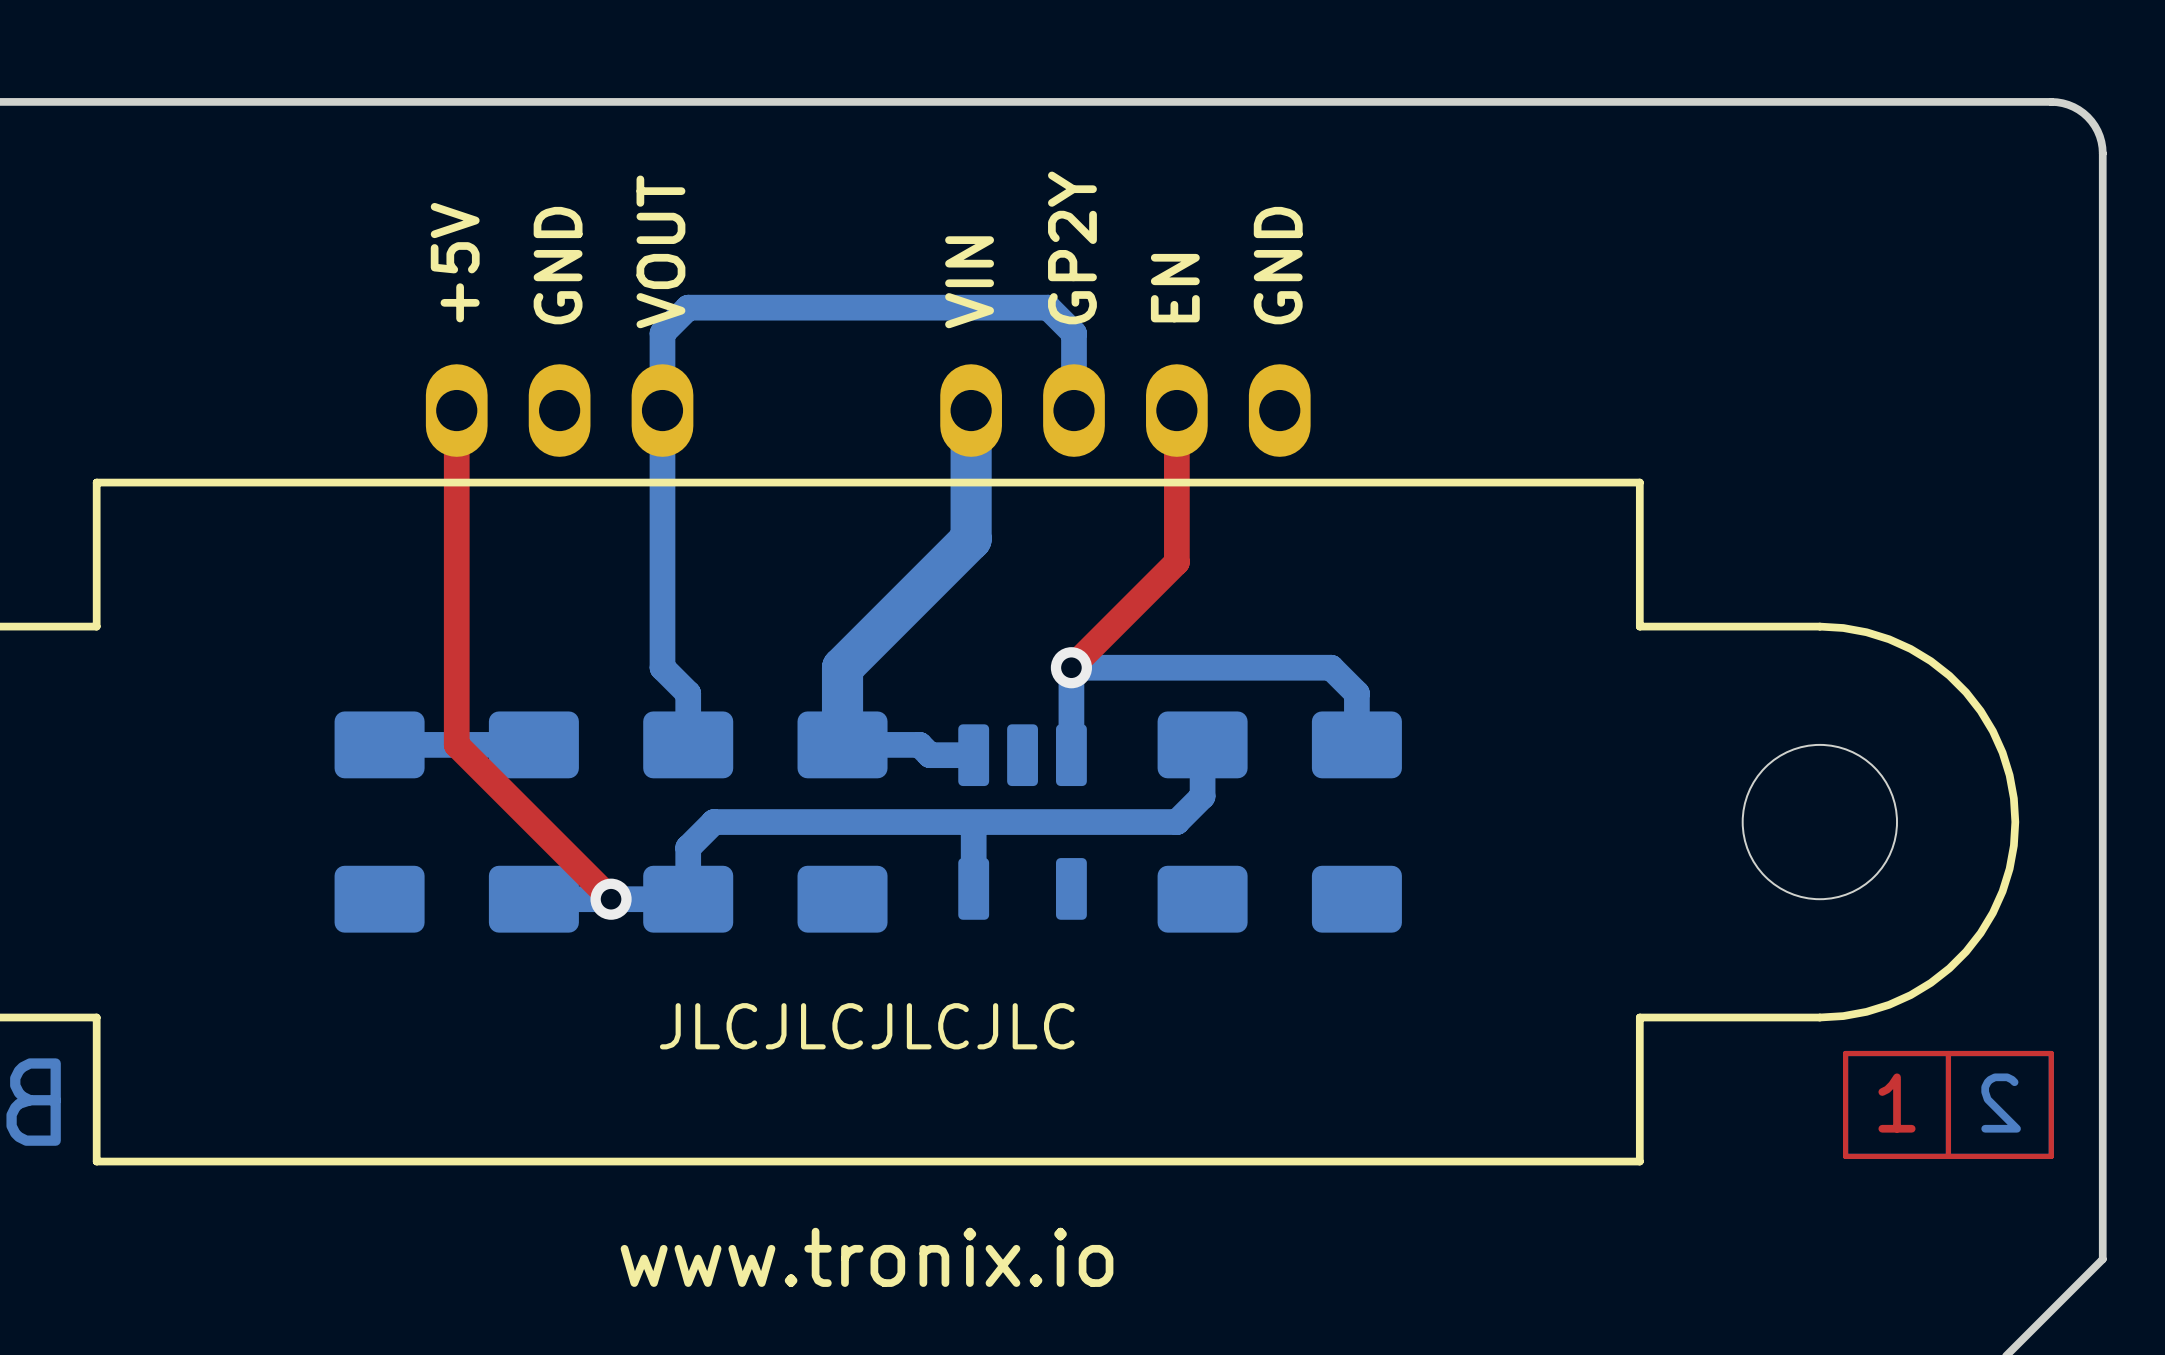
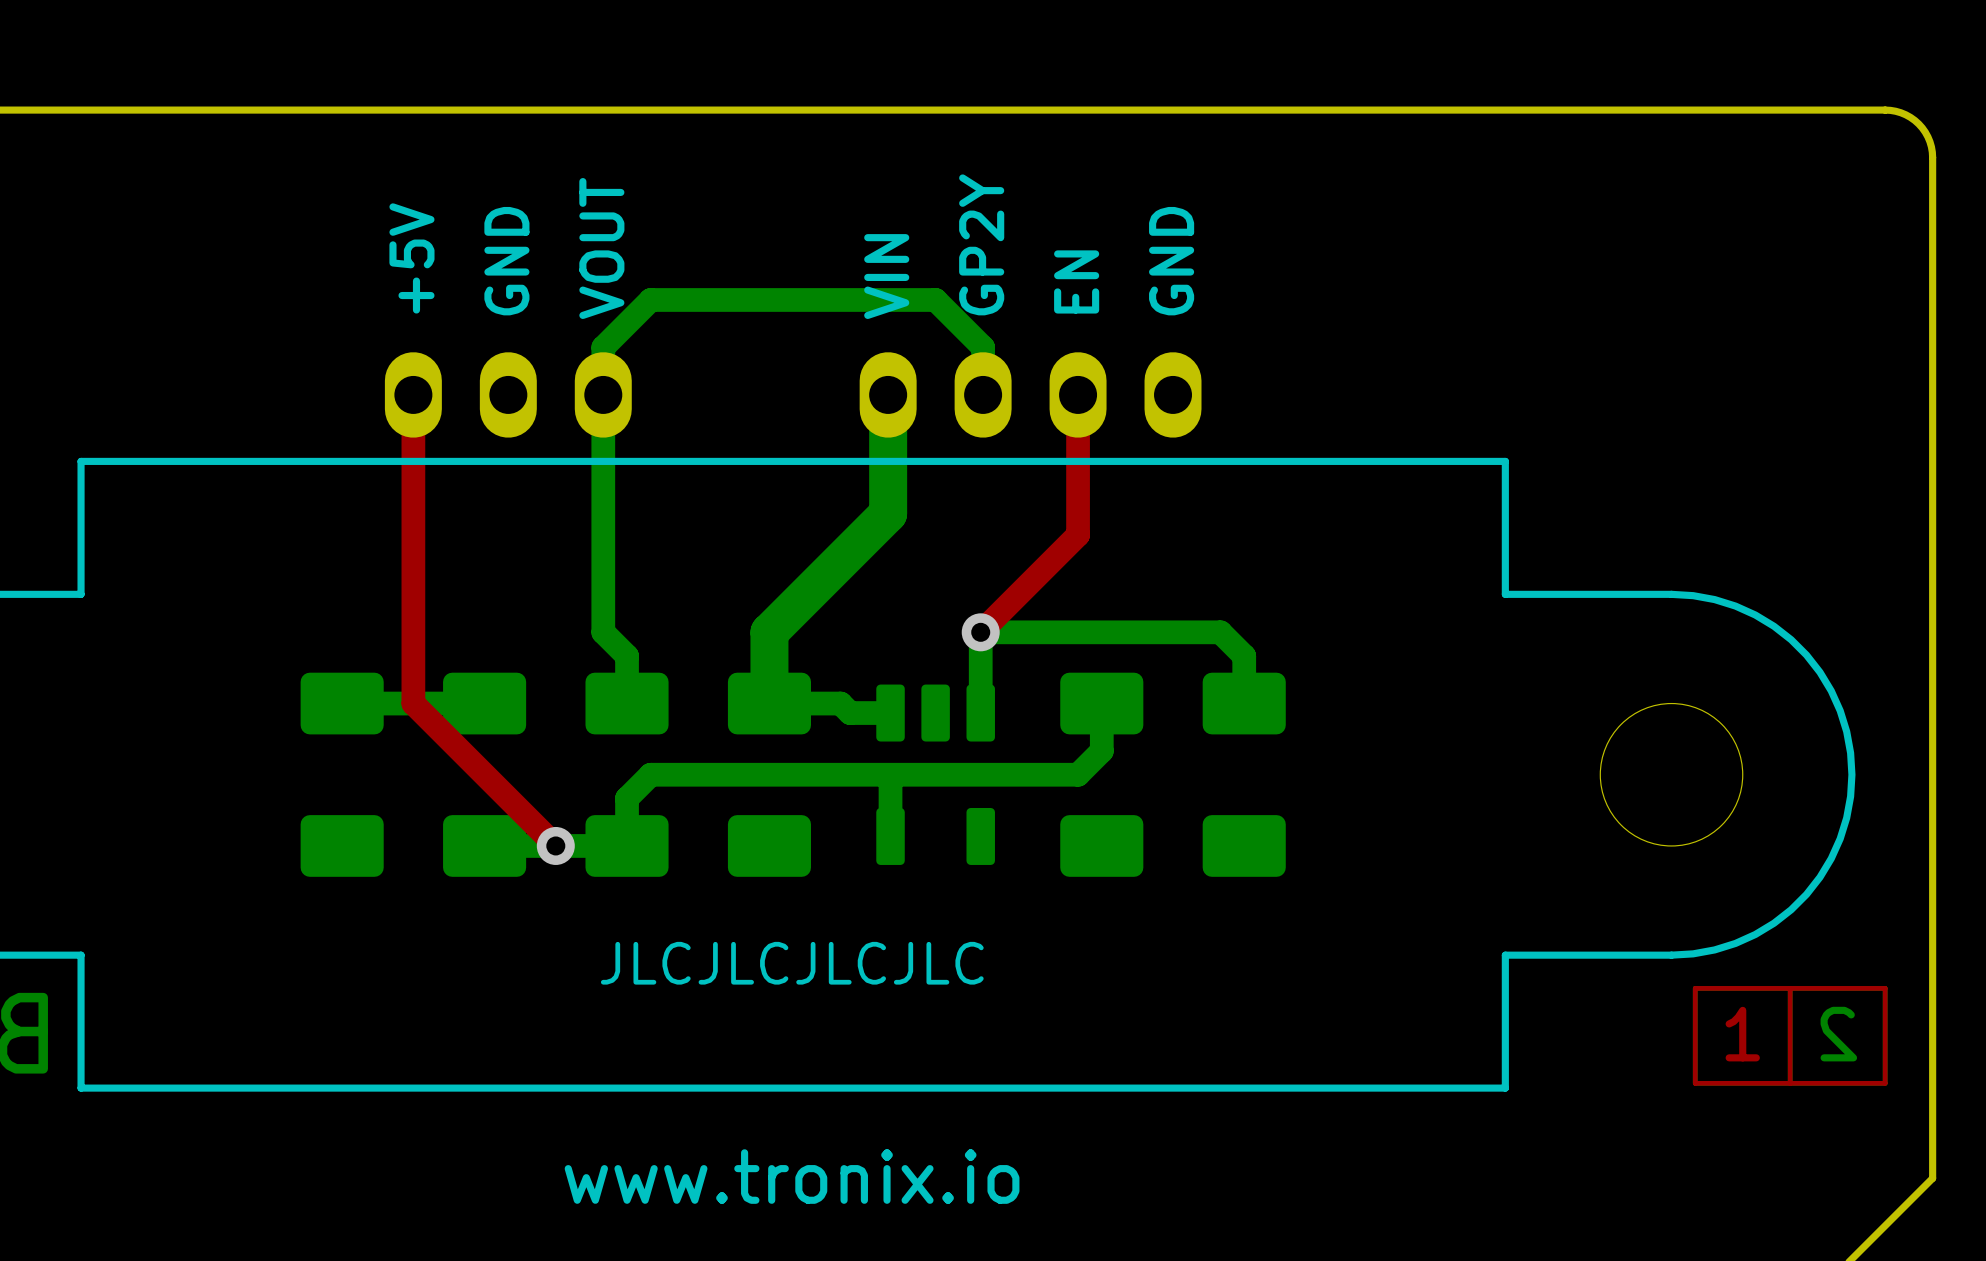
bottom track: (713, 307) (688, 307) (662, 333) (662, 359) -> (650, 299) (603, 347)
bottom track: (1022, 307) (1048, 307) (1074, 333) (1074, 359) -> (935, 299) (983, 347)

